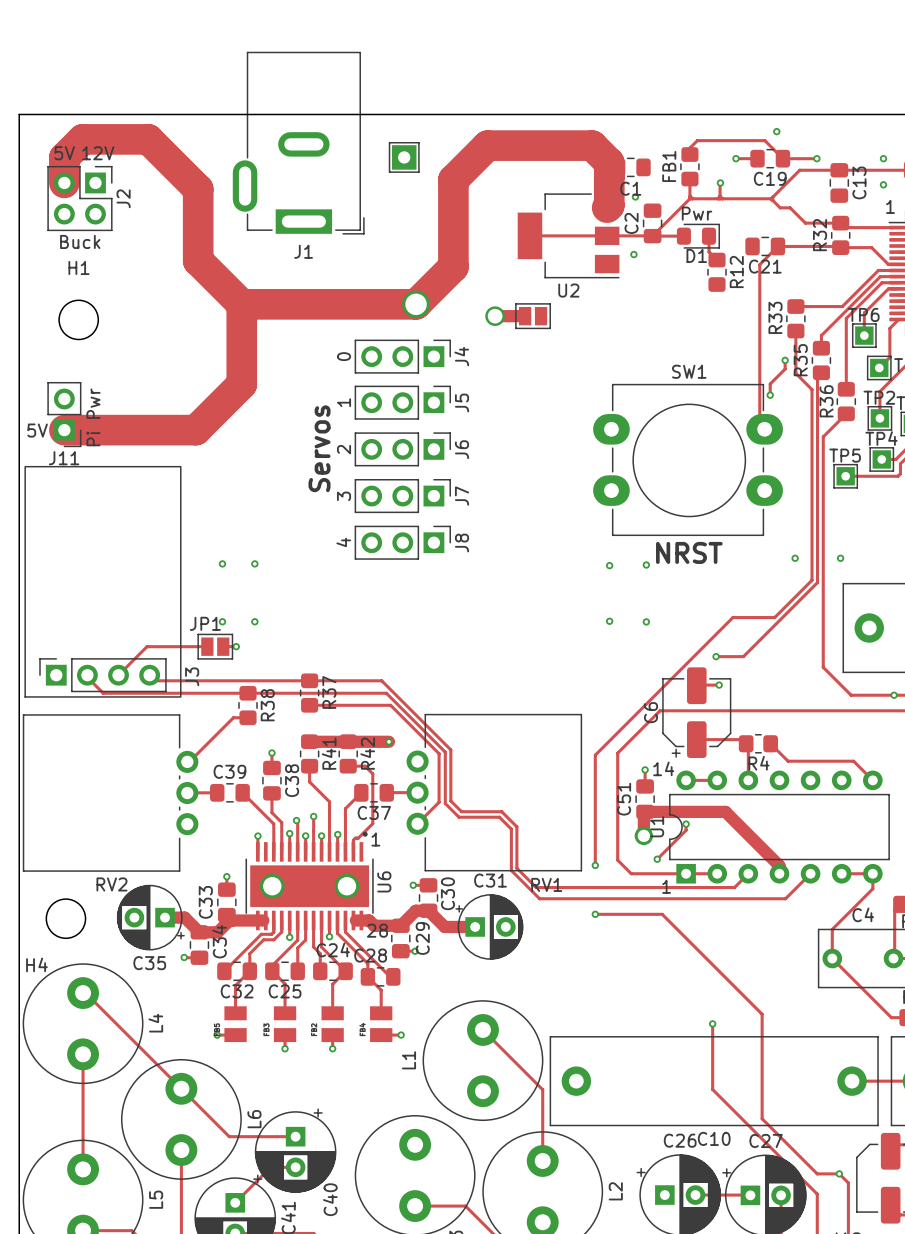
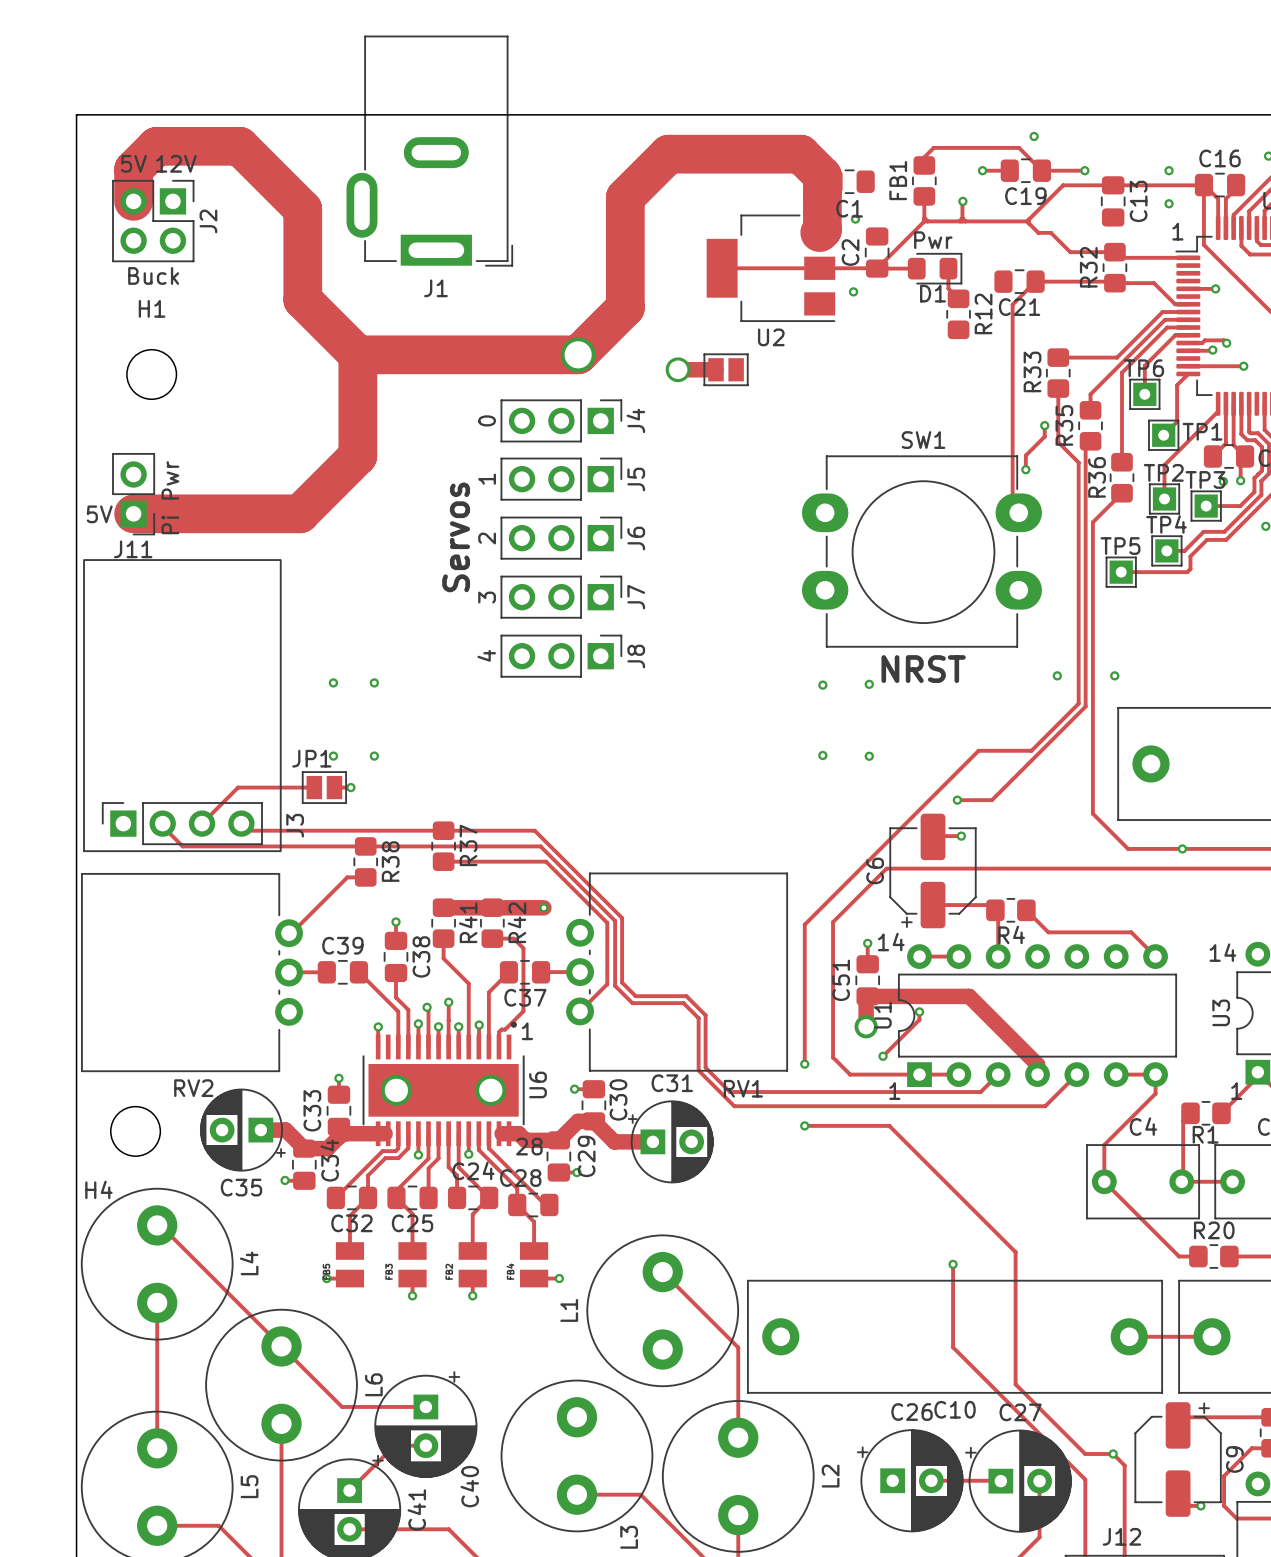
part: (404, 157) -> none

